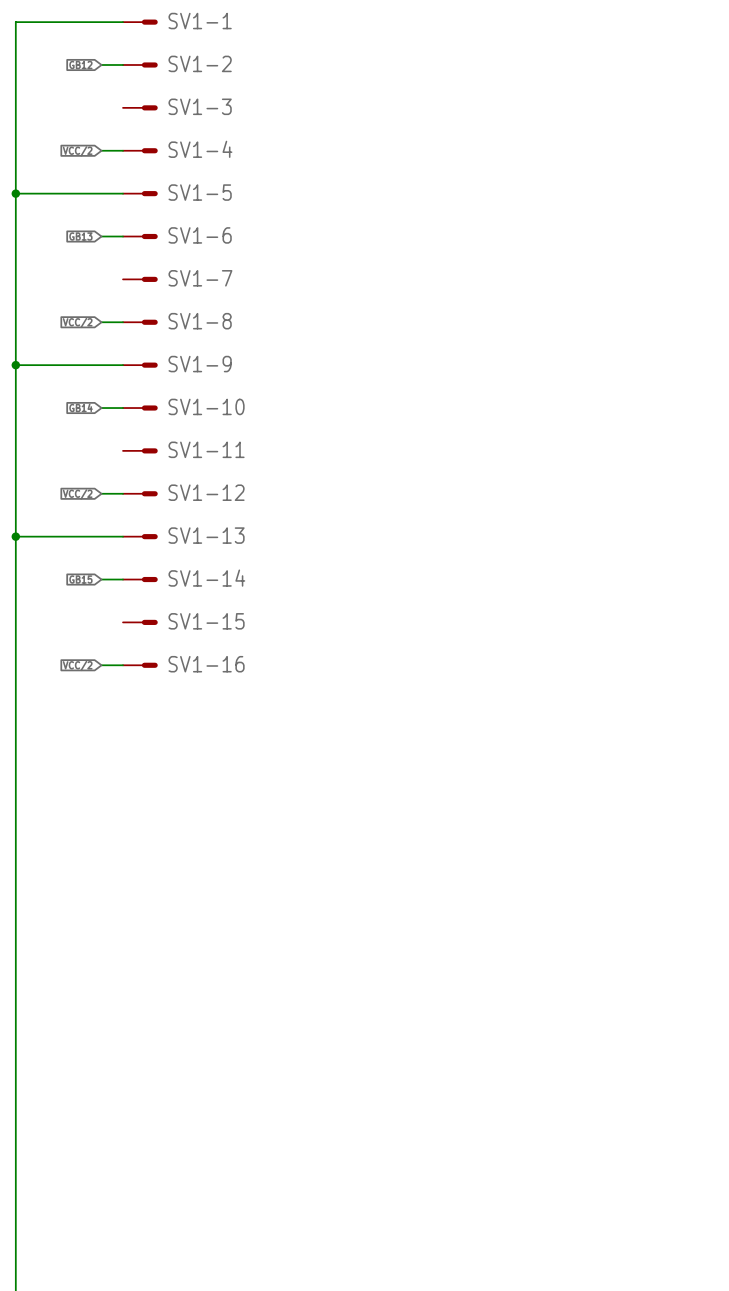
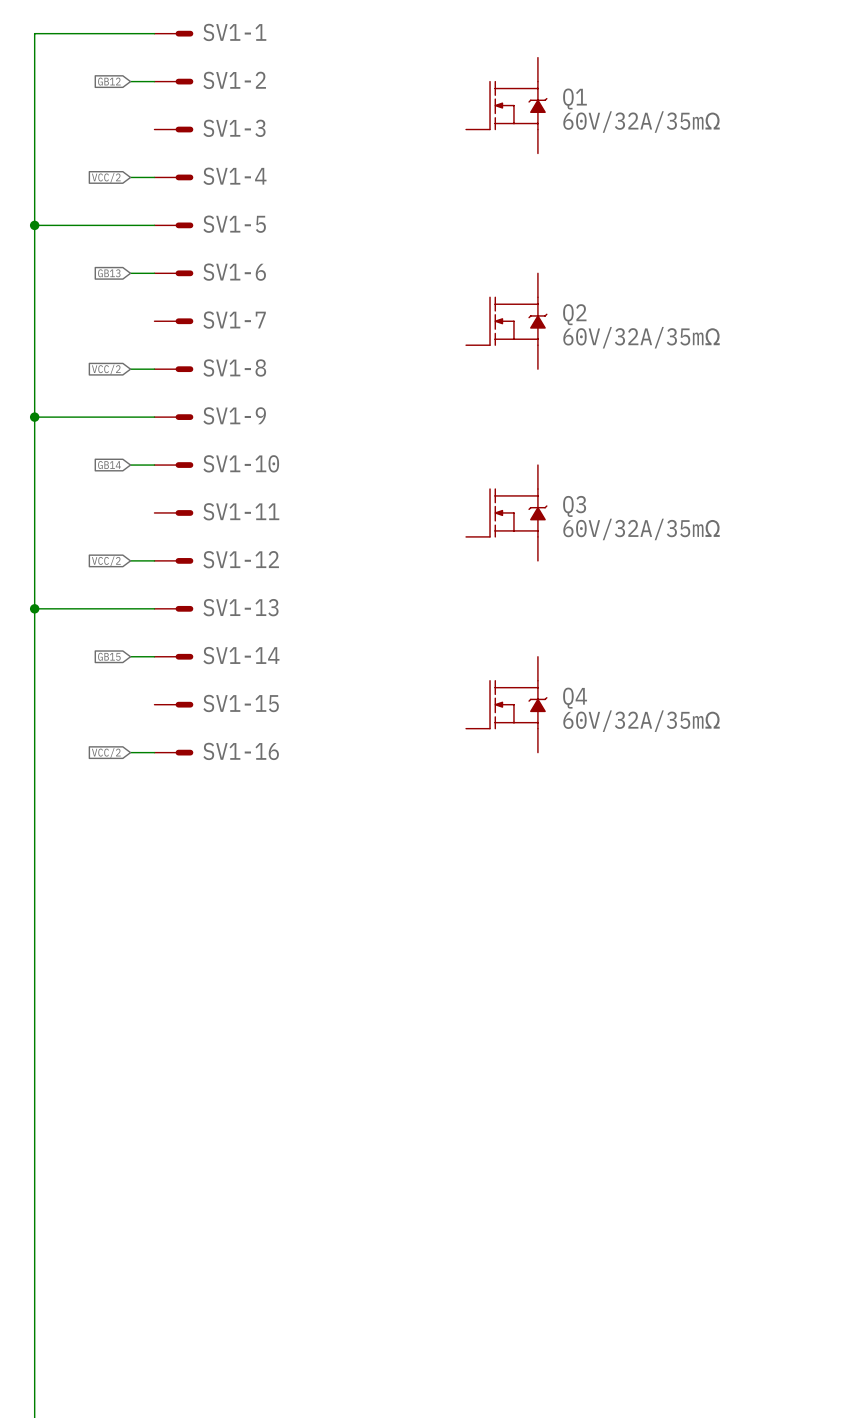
Q1: none -> 60V/32A/35mΩ (506, 105)
Q2: none -> 60V/32A/35mΩ (506, 321)
Q3: none -> 60V/32A/35mΩ (506, 512)
Q4: none -> 60V/32A/35mΩ (506, 704)

